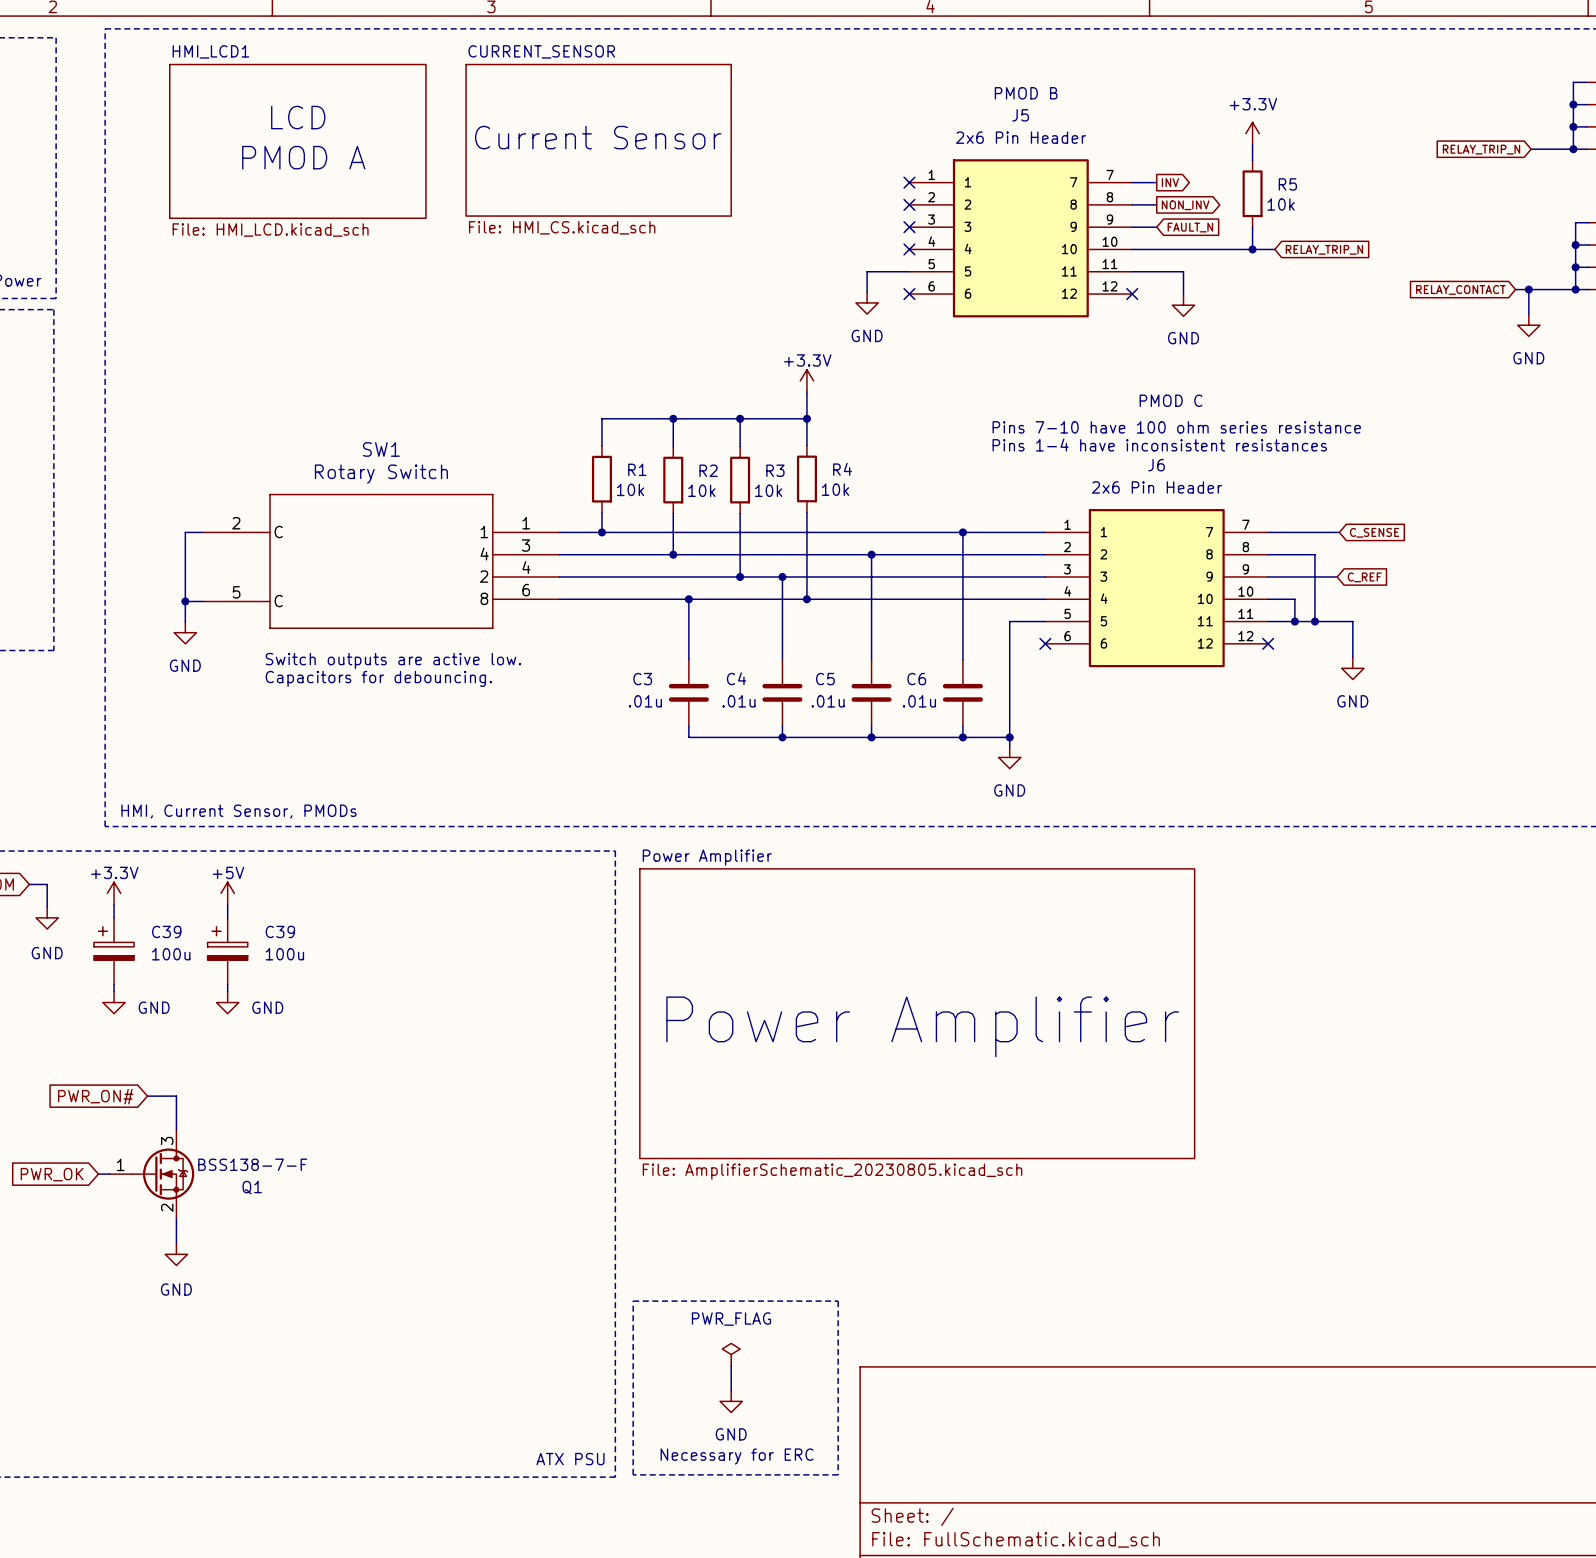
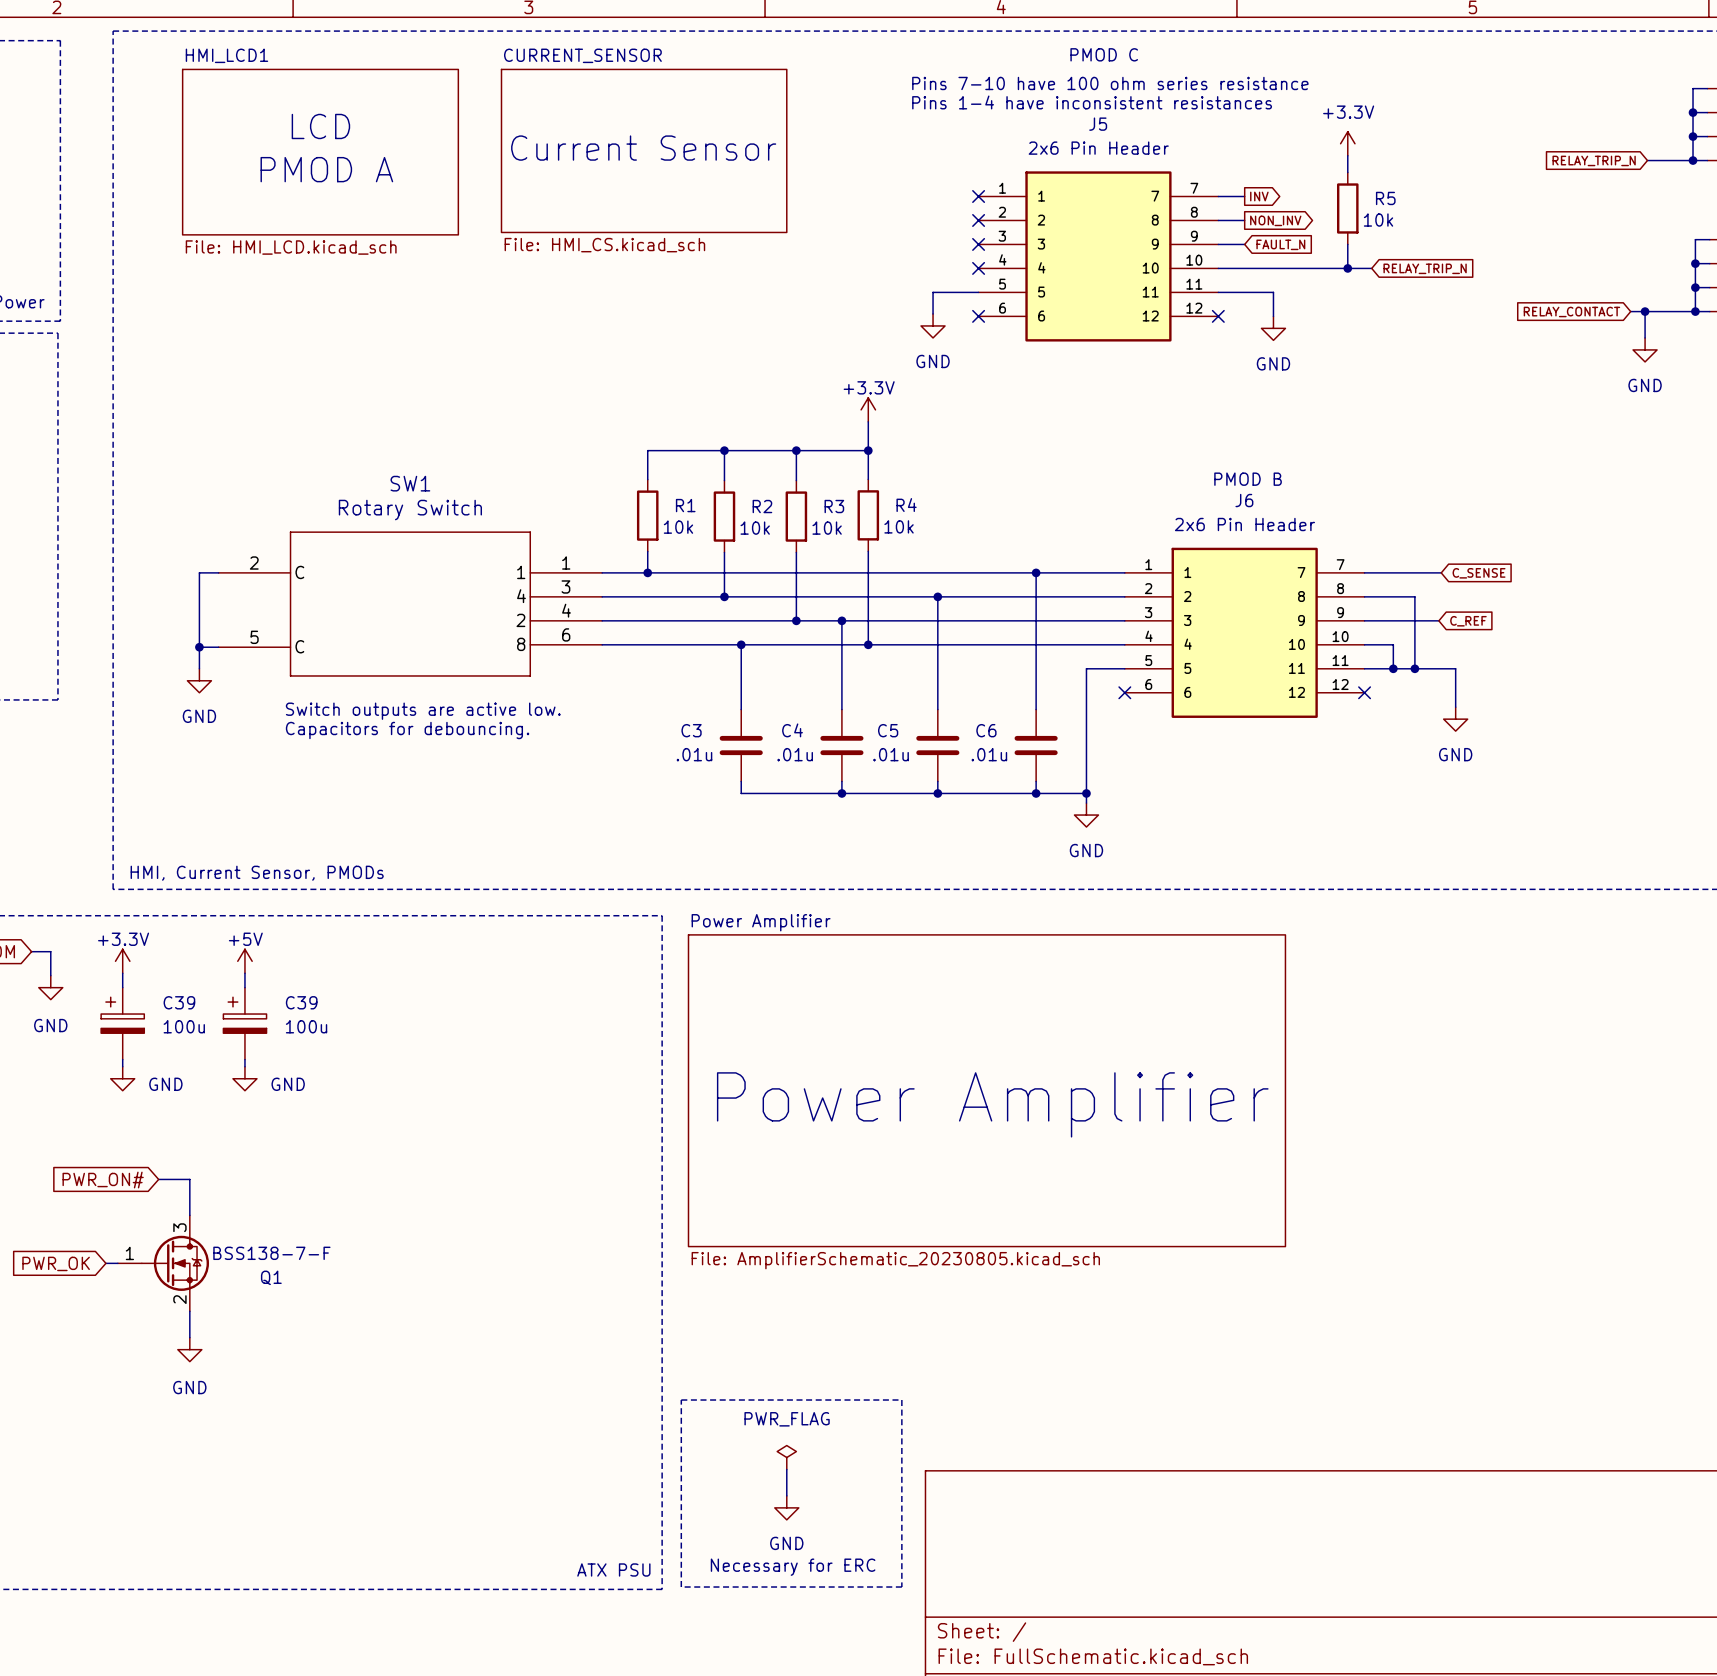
text: none -> PMOD C (1104, 54)
text: none -> Pins 7-10 have 100 ohm series resistance (1110, 83)
text: PMOD B (1026, 93) -> none
text: none -> Pins 1-4 have inconsistent resistances (1092, 102)
text: PMOD C (1171, 400) -> none
text: Pins 7-10 have 100 ohm series resistance (1176, 427) -> none
text: Pins 1-4 have inconsistent resistances (1159, 445) -> none
text: none -> PMOD B (1248, 479)

